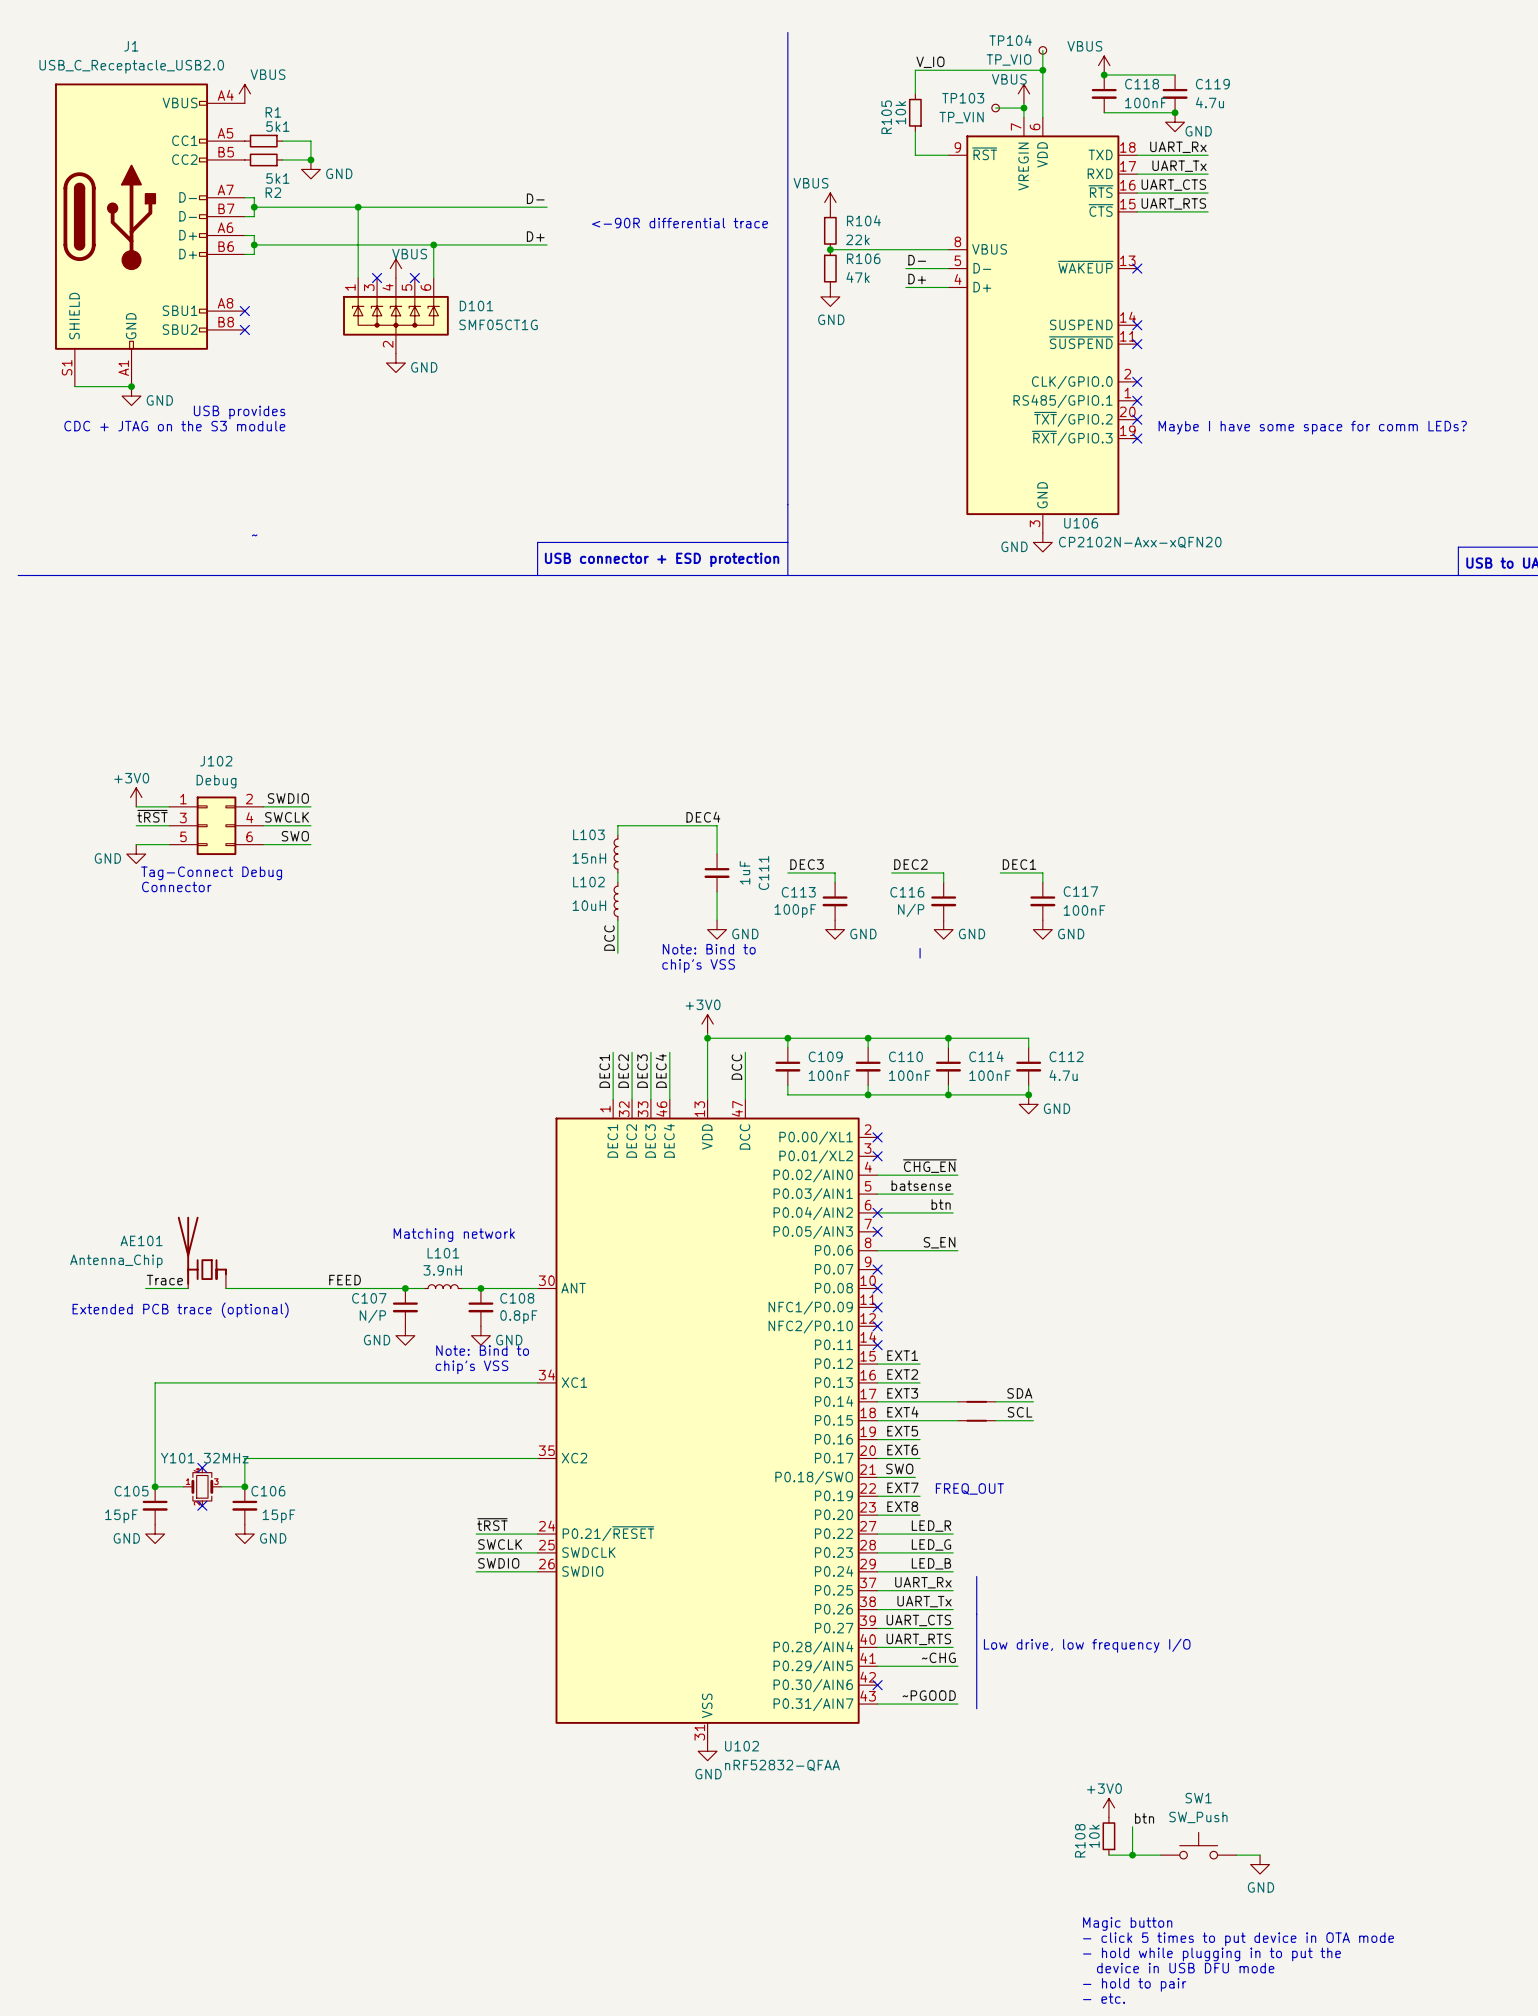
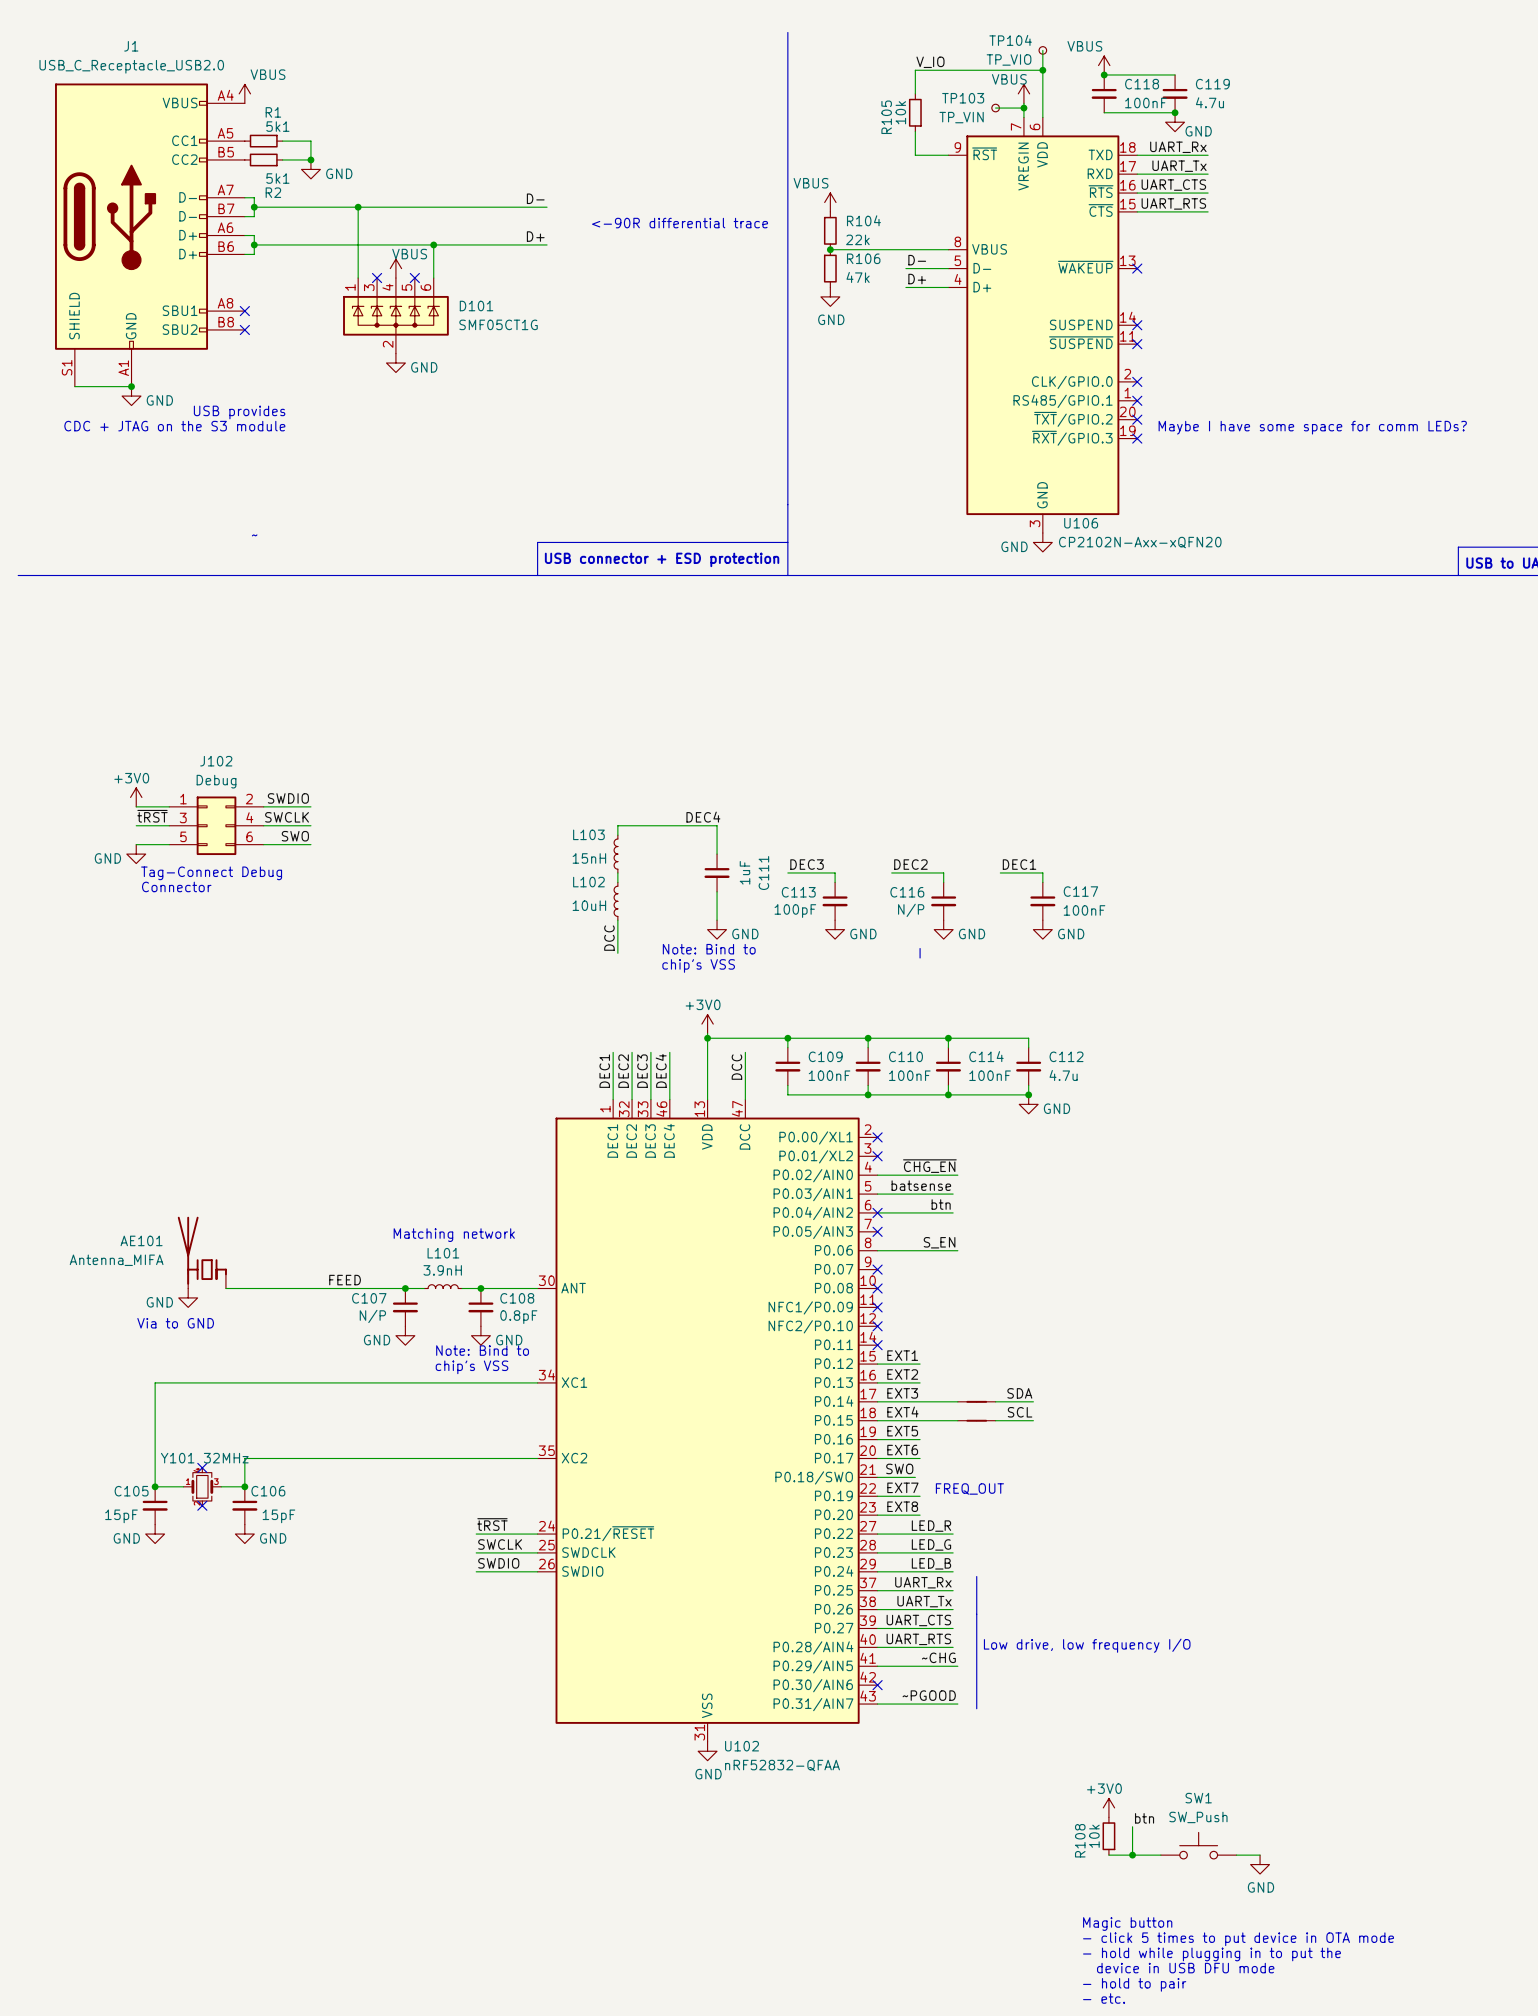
AE101 value: Antenna_Chip (116, 1261) -> Antenna_MIFA (116, 1260)
label: Trace (164, 1280) -> none
wire: (145, 1288) (188, 1288) -> none
power symbol: none -> GND (188, 1297)
text: Extended PCB trace (optional) (180, 1310) -> none
text: none -> Via to GND (175, 1323)

